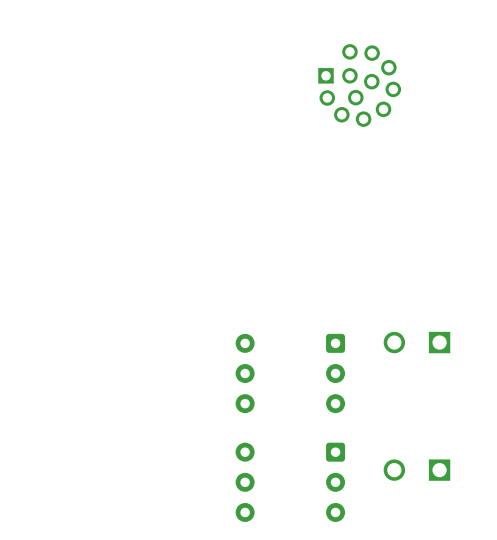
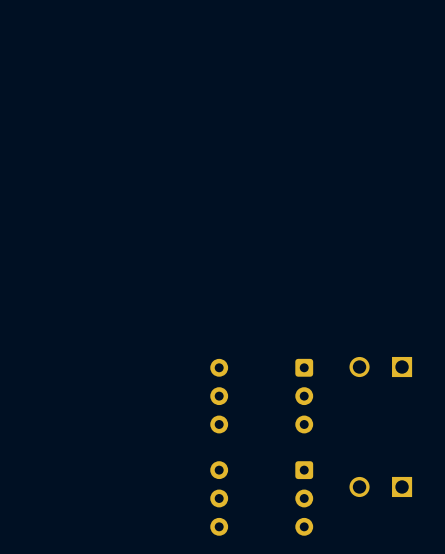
part: (359, 85) -> none

